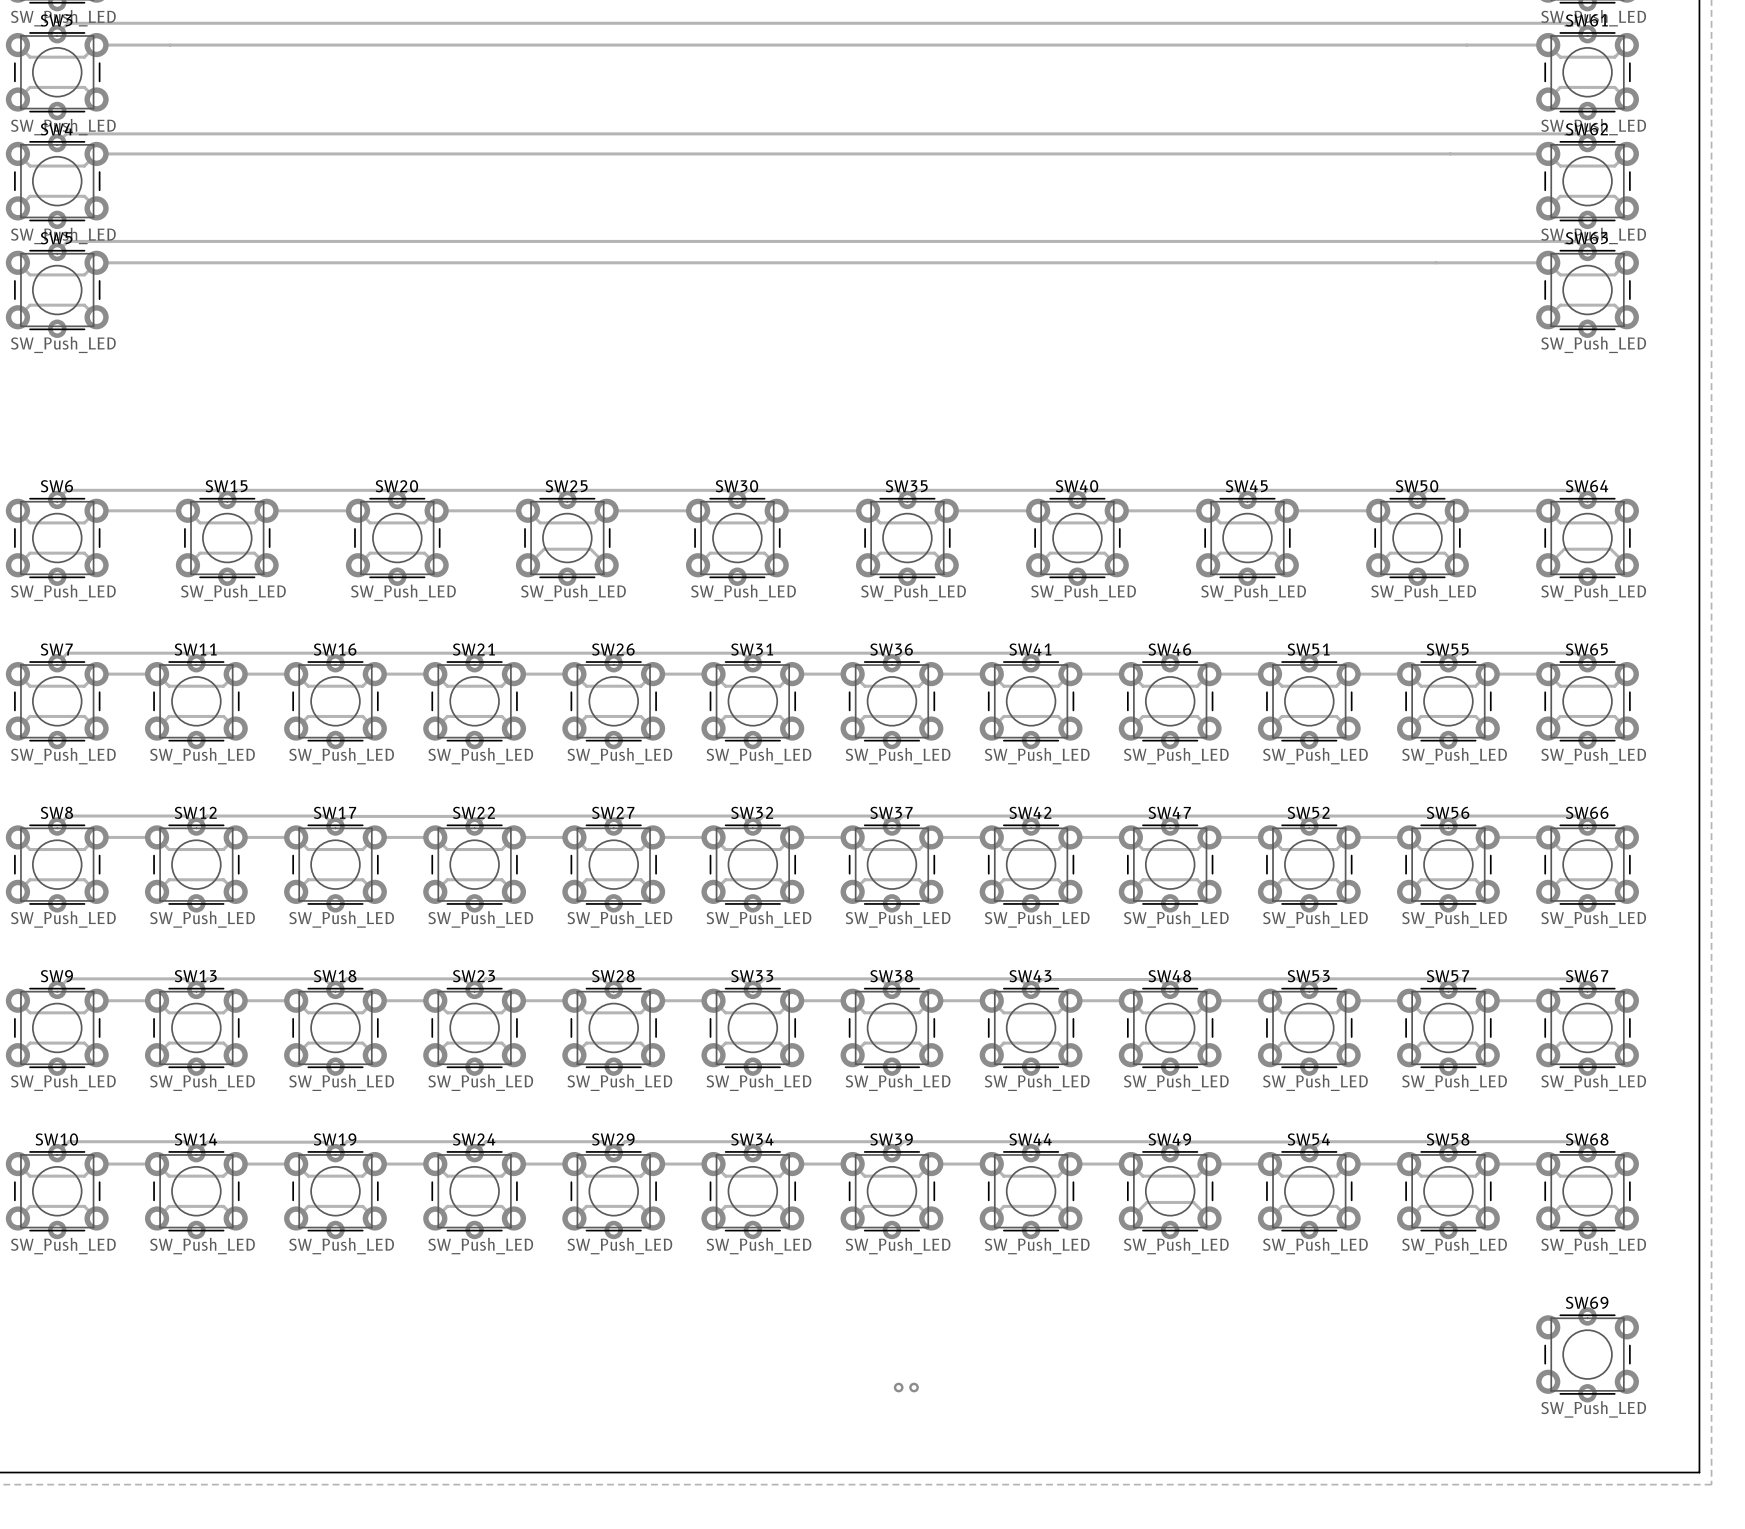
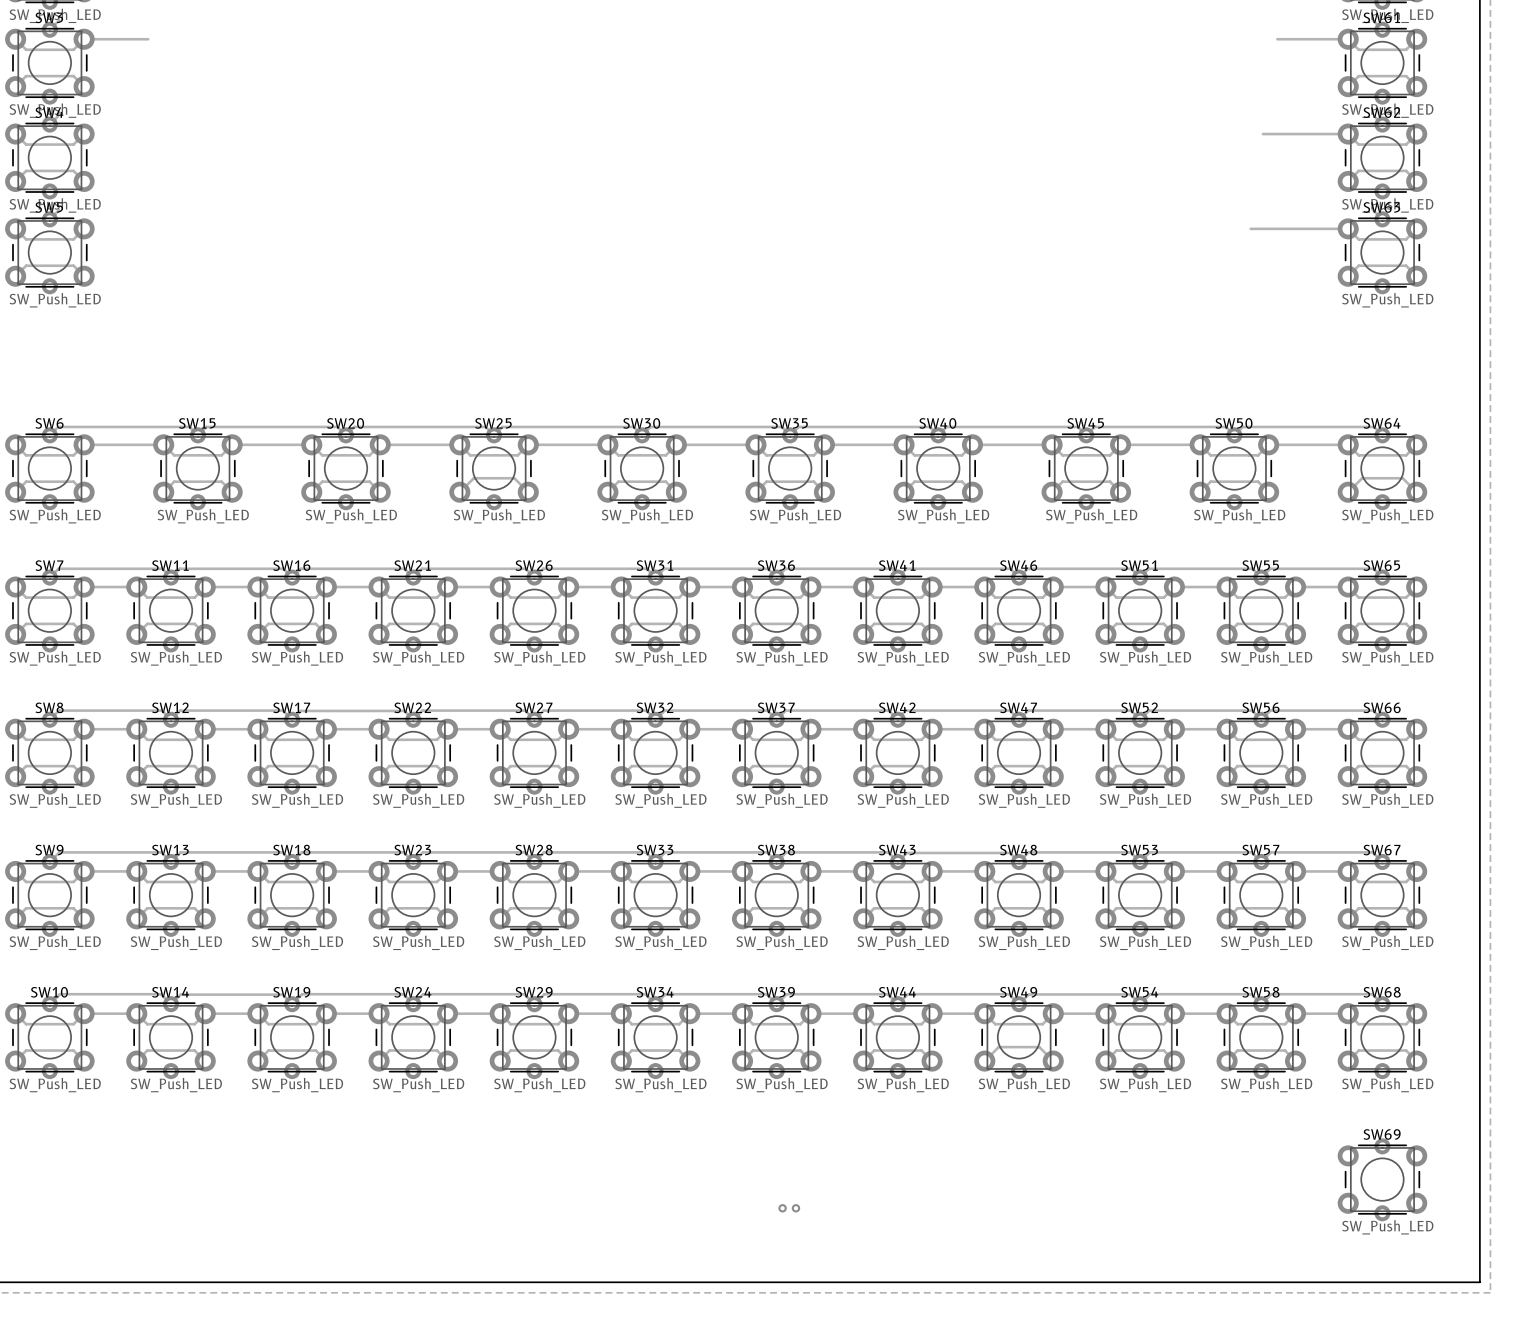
track: (68, 23) (1576, 23) -> none
track: (170, 45) (1466, 45) -> none
track: (66, 133) (1578, 133) -> none
track: (96, 153) (1450, 153) -> none
track: (67, 241) (1577, 241) -> none
track: (96, 262) (1436, 262) -> none

